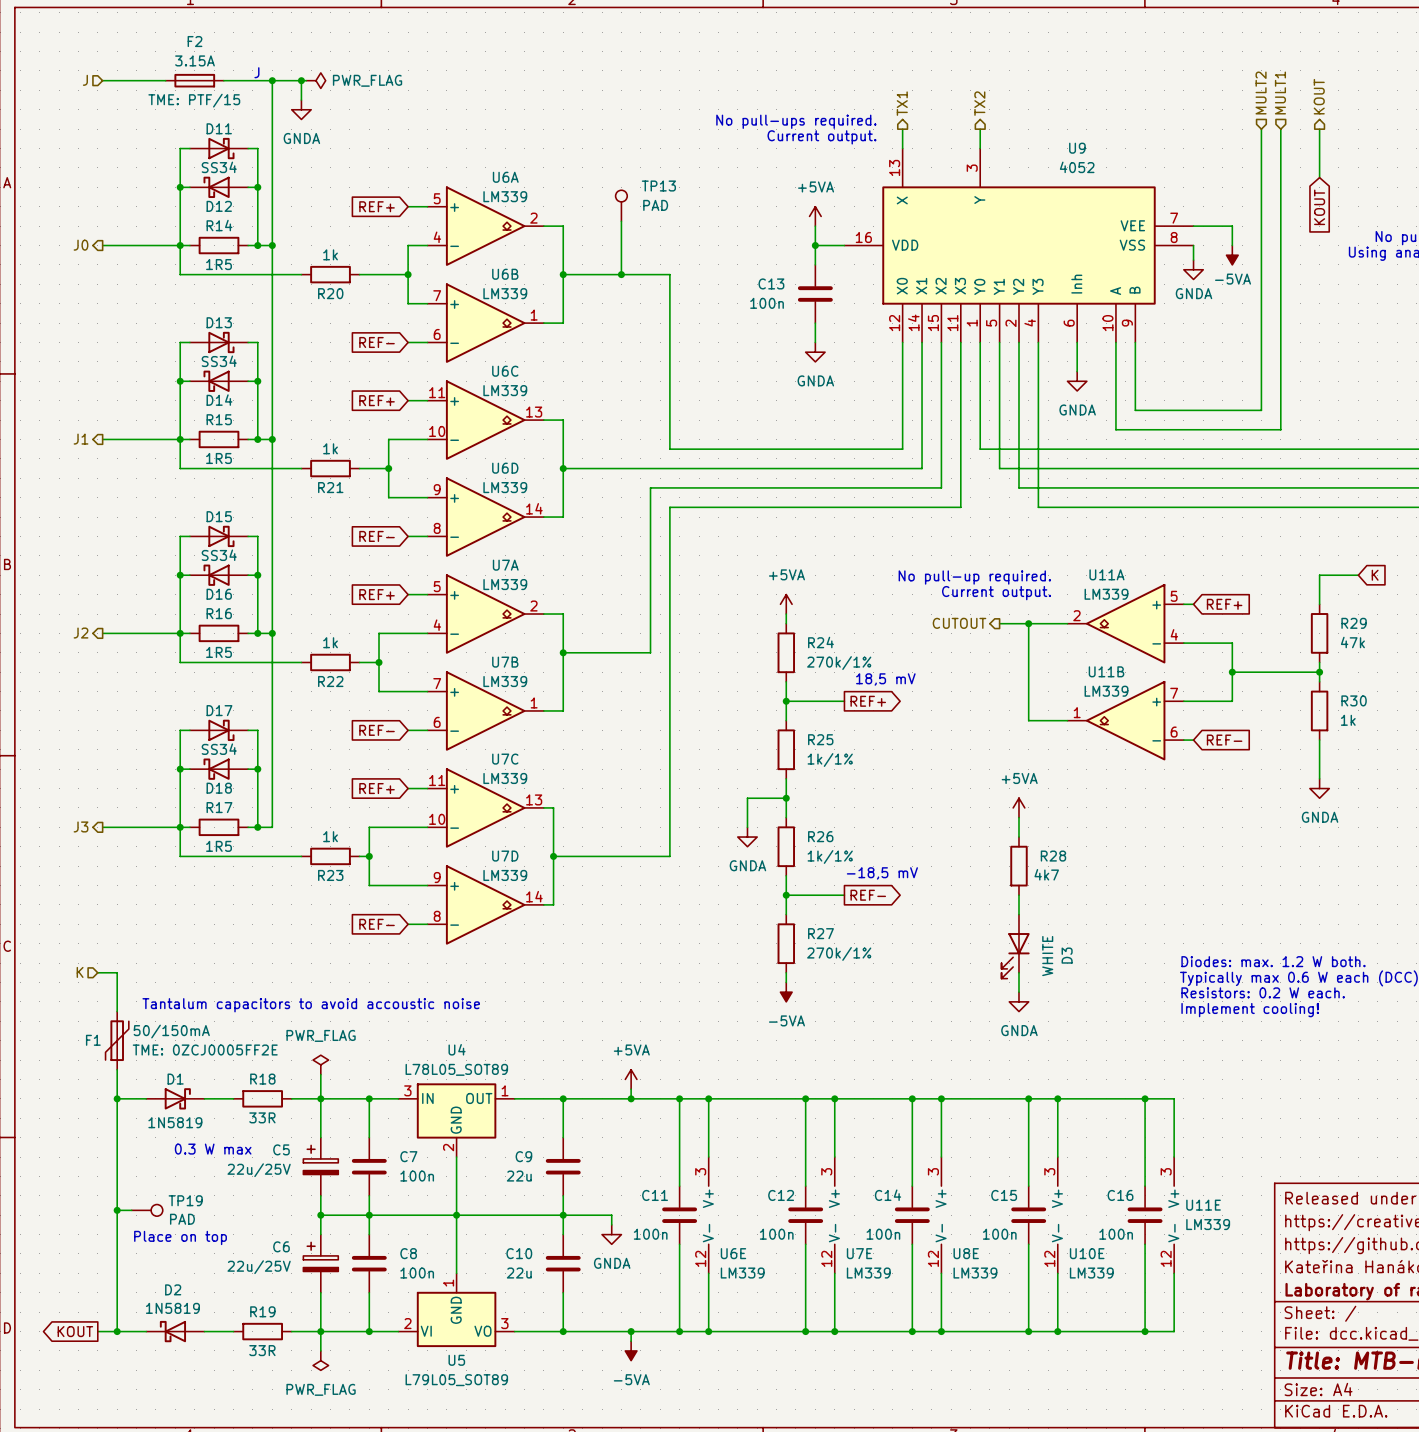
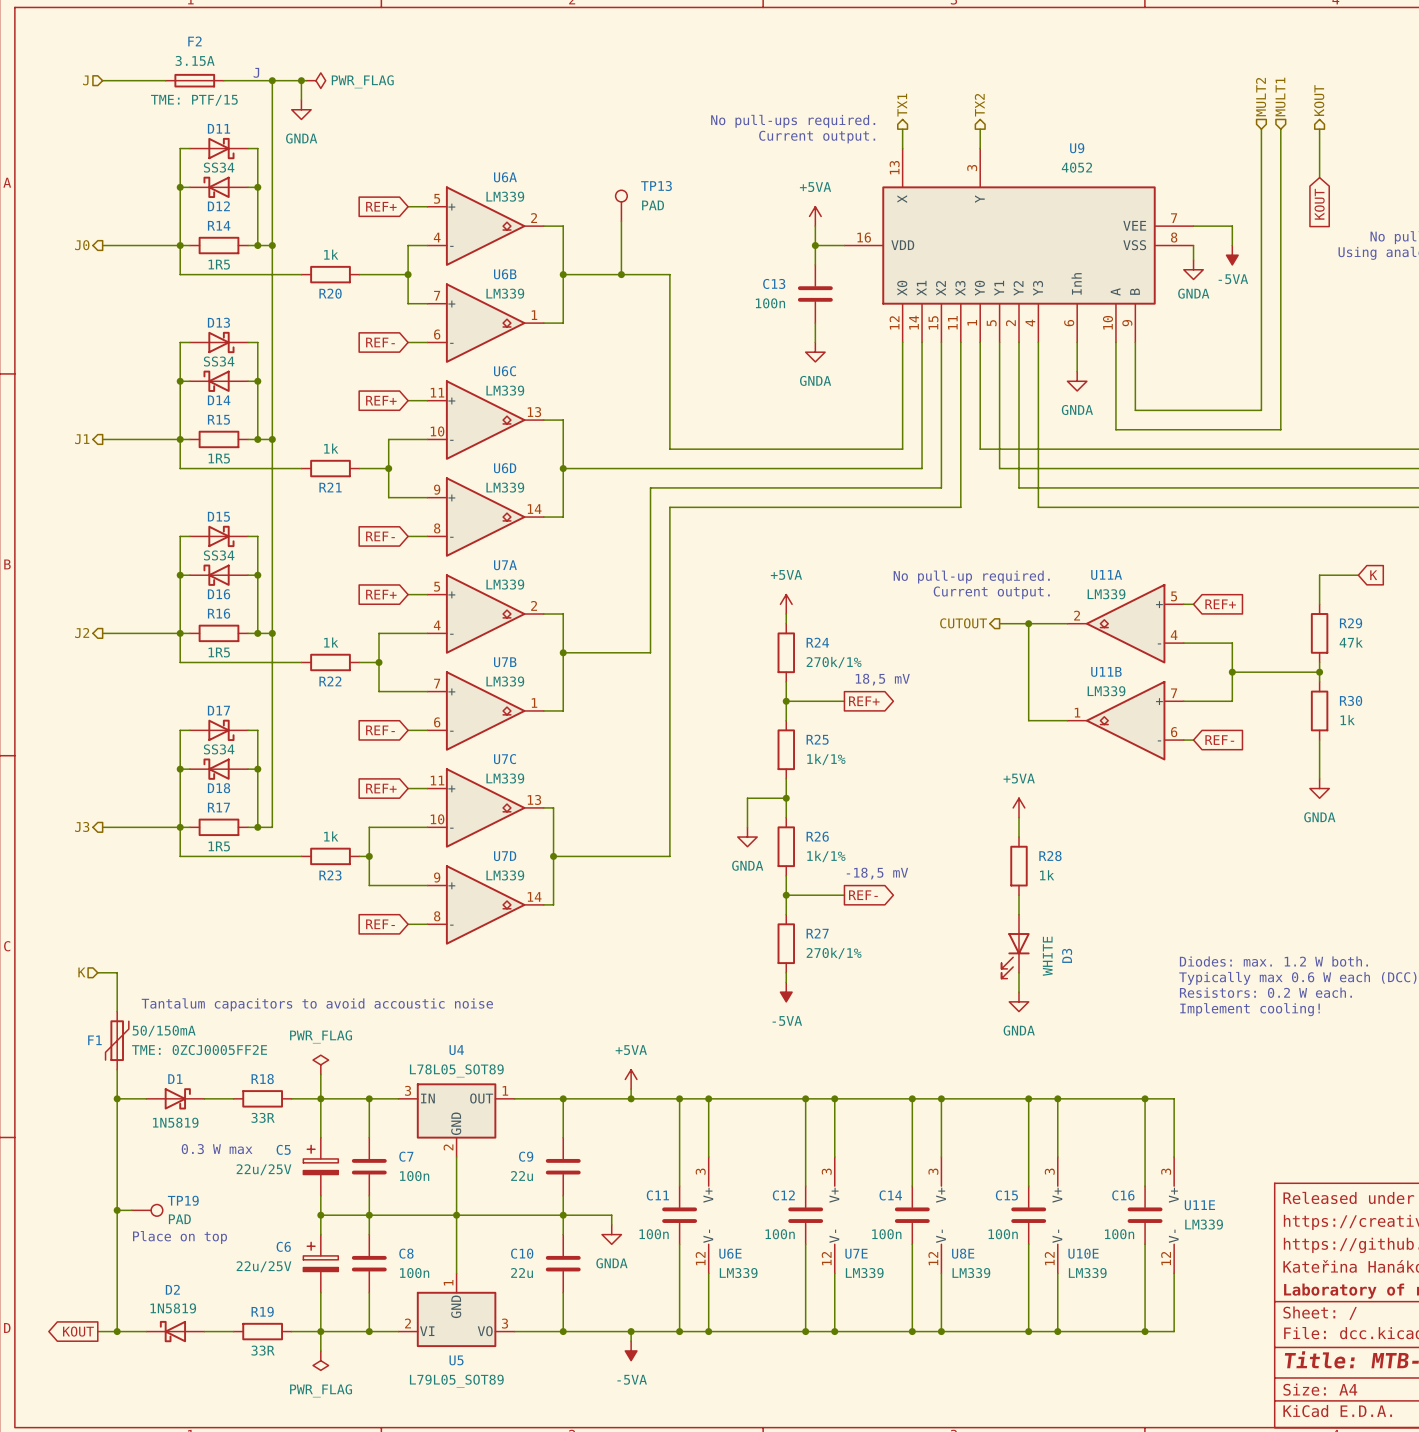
R28 value: 4k7 (1046, 874) -> 1k (1047, 875)

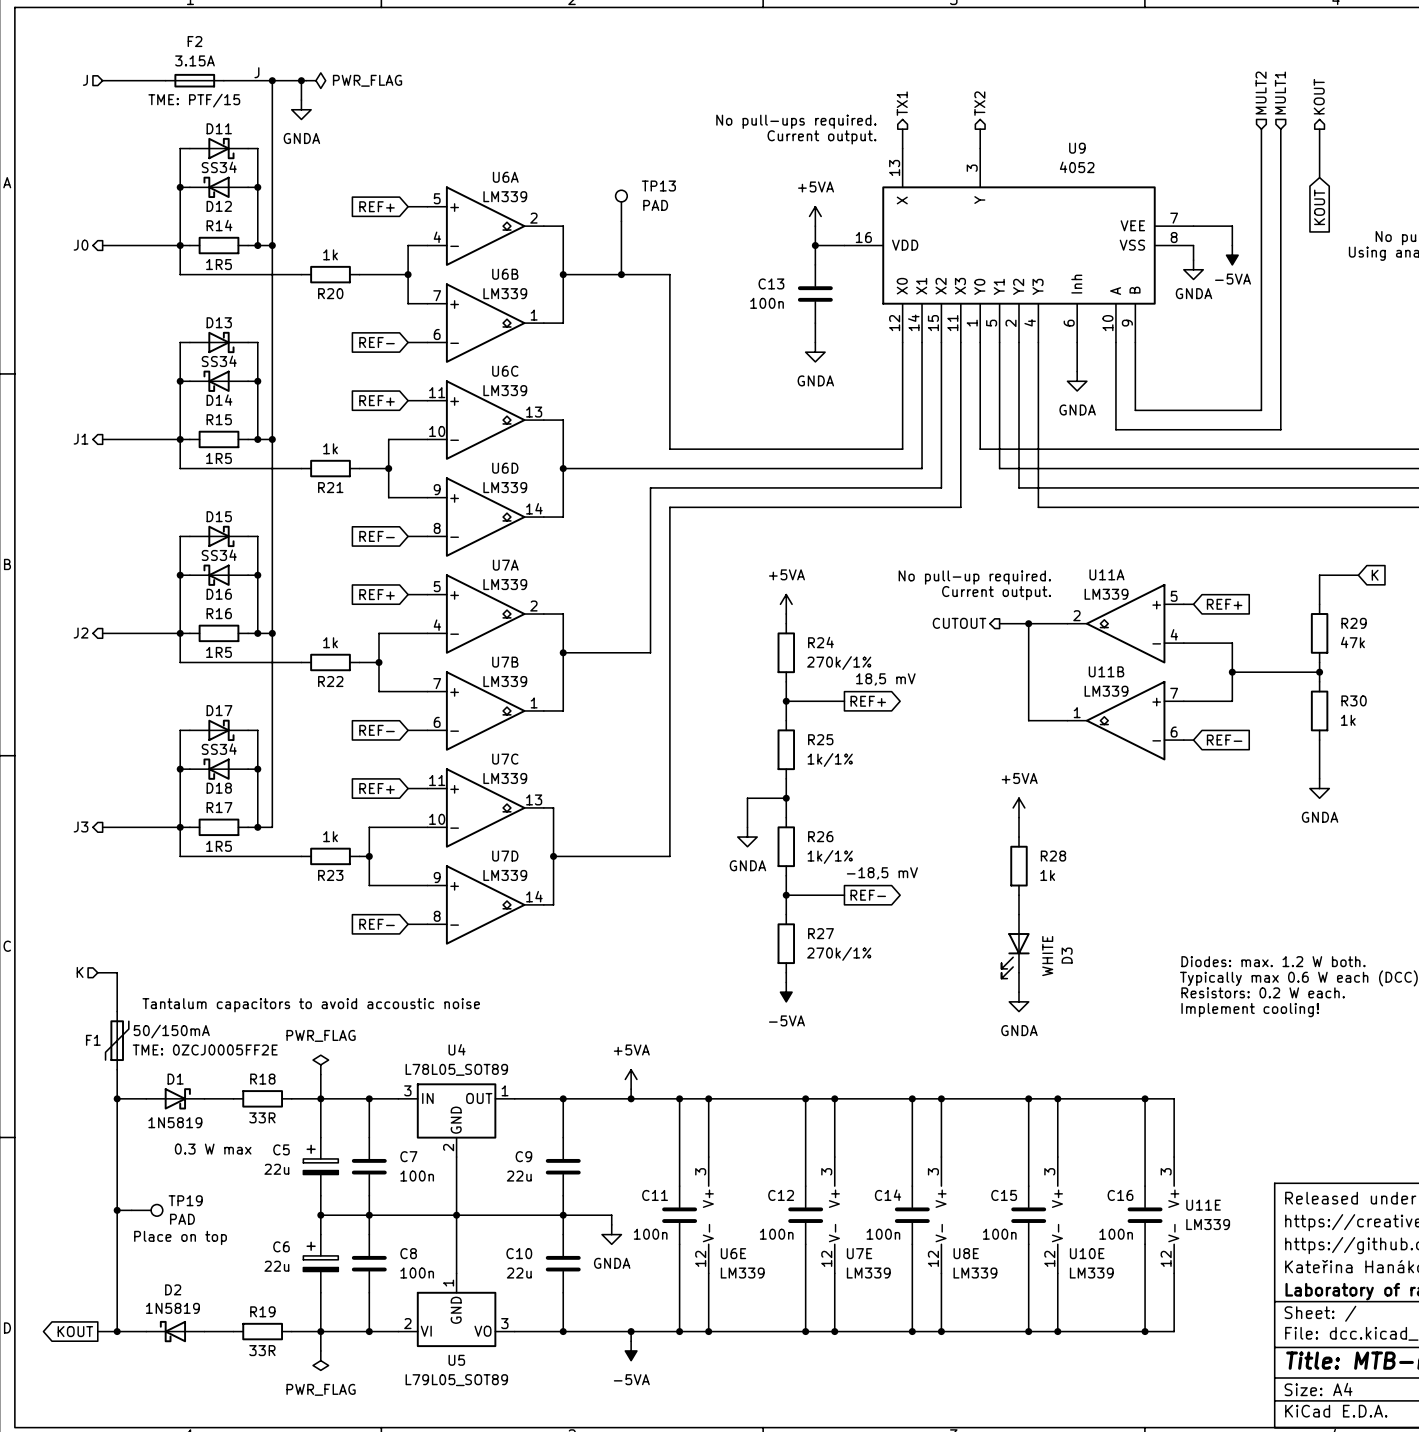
C5 value: 22u/25V (264, 1169) -> 22u (276, 1169)
C6 value: 22u/25V (264, 1266) -> 22u (276, 1266)

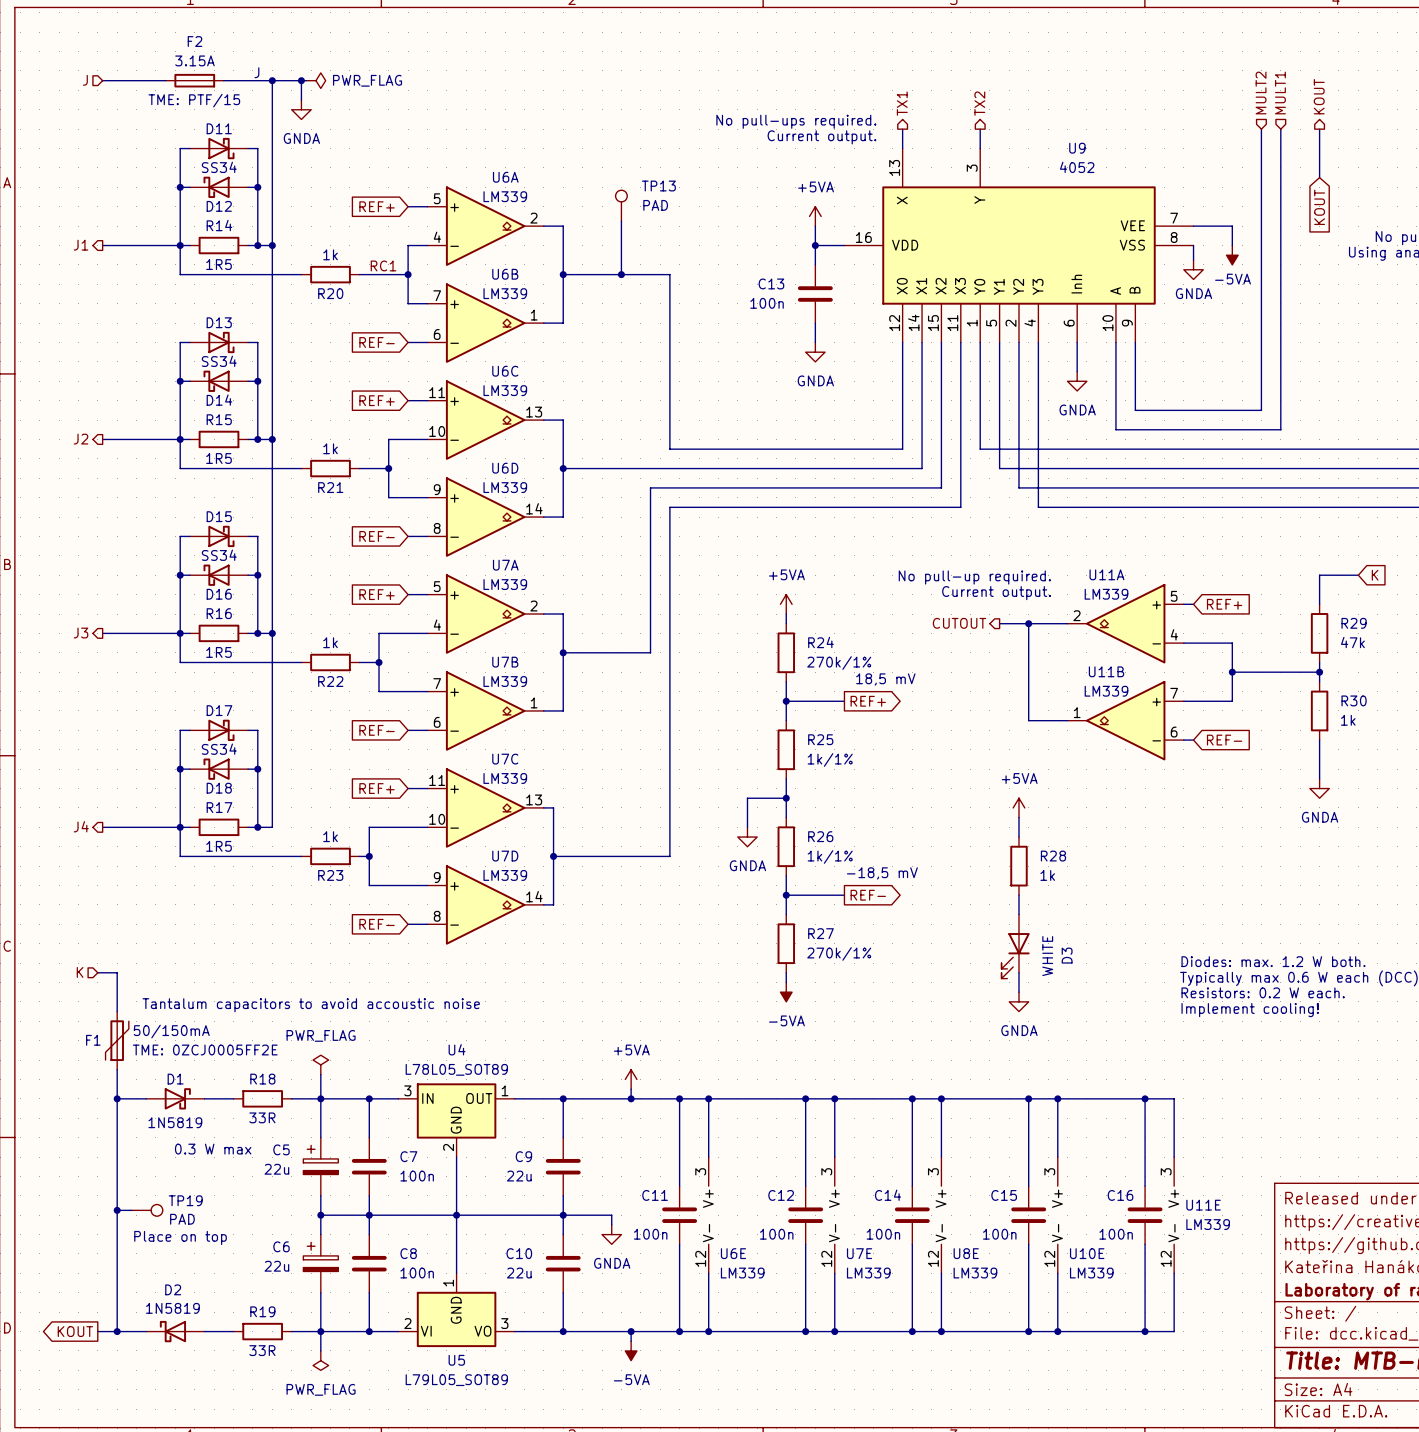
hierarchical label: J0 (81, 245) -> J1 (81, 245)
label: none -> RC1 (383, 265)
hierarchical label: J1 (81, 439) -> J2 (81, 439)
hierarchical label: J2 (81, 633) -> J3 (81, 633)
hierarchical label: J3 (81, 826) -> J4 (81, 826)

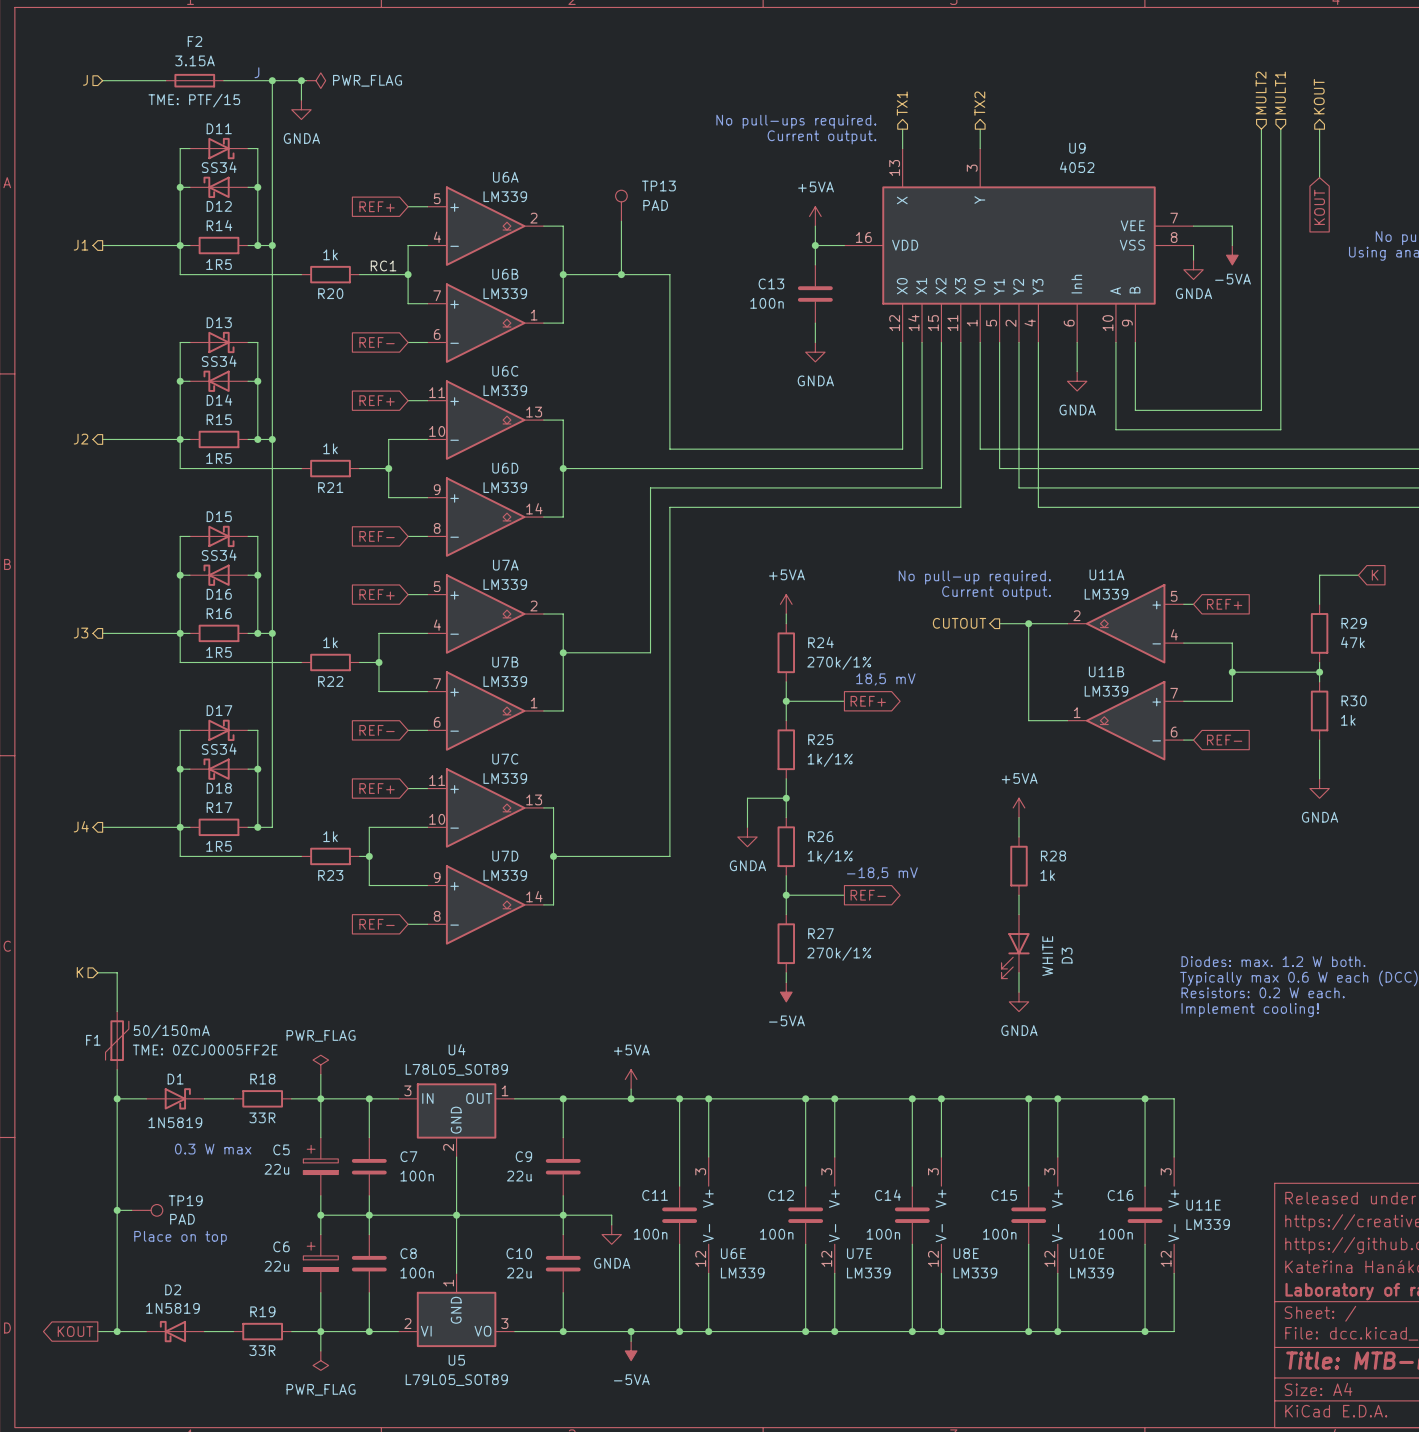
text: Tantalum capacitors to avoid accoustic noise (311, 1005) -> none

